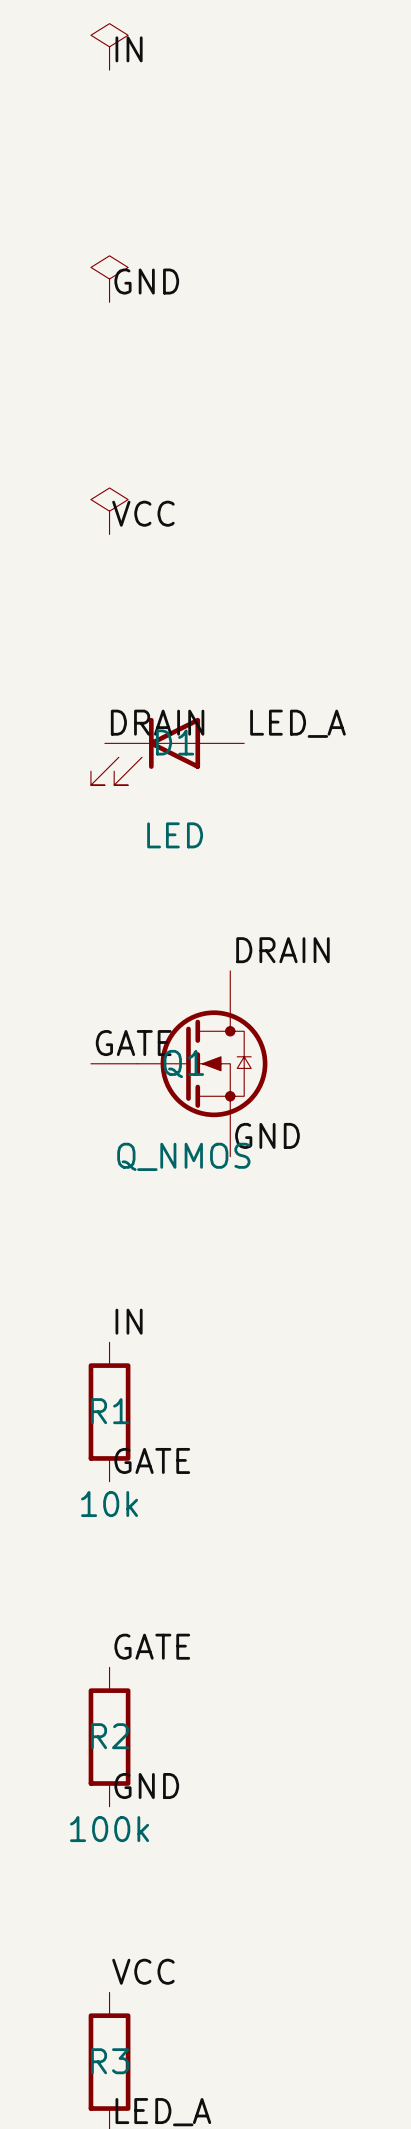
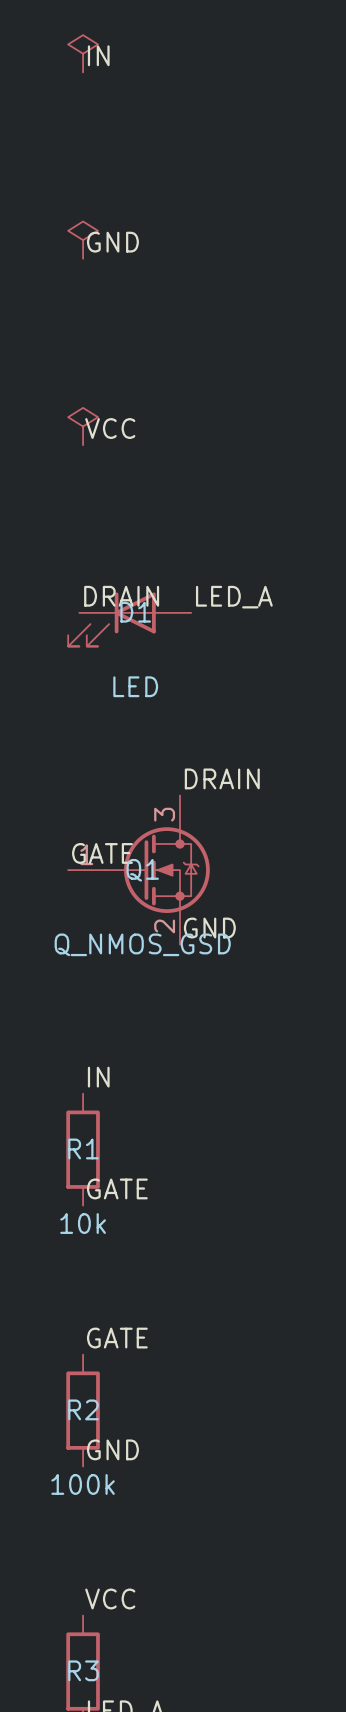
Q1 symbol: [90, 970, 268, 1157] -> [68, 795, 210, 945]
Q1 value: Q_NMOS (183, 1156) -> Q_NMOS_GSD (142, 944)

